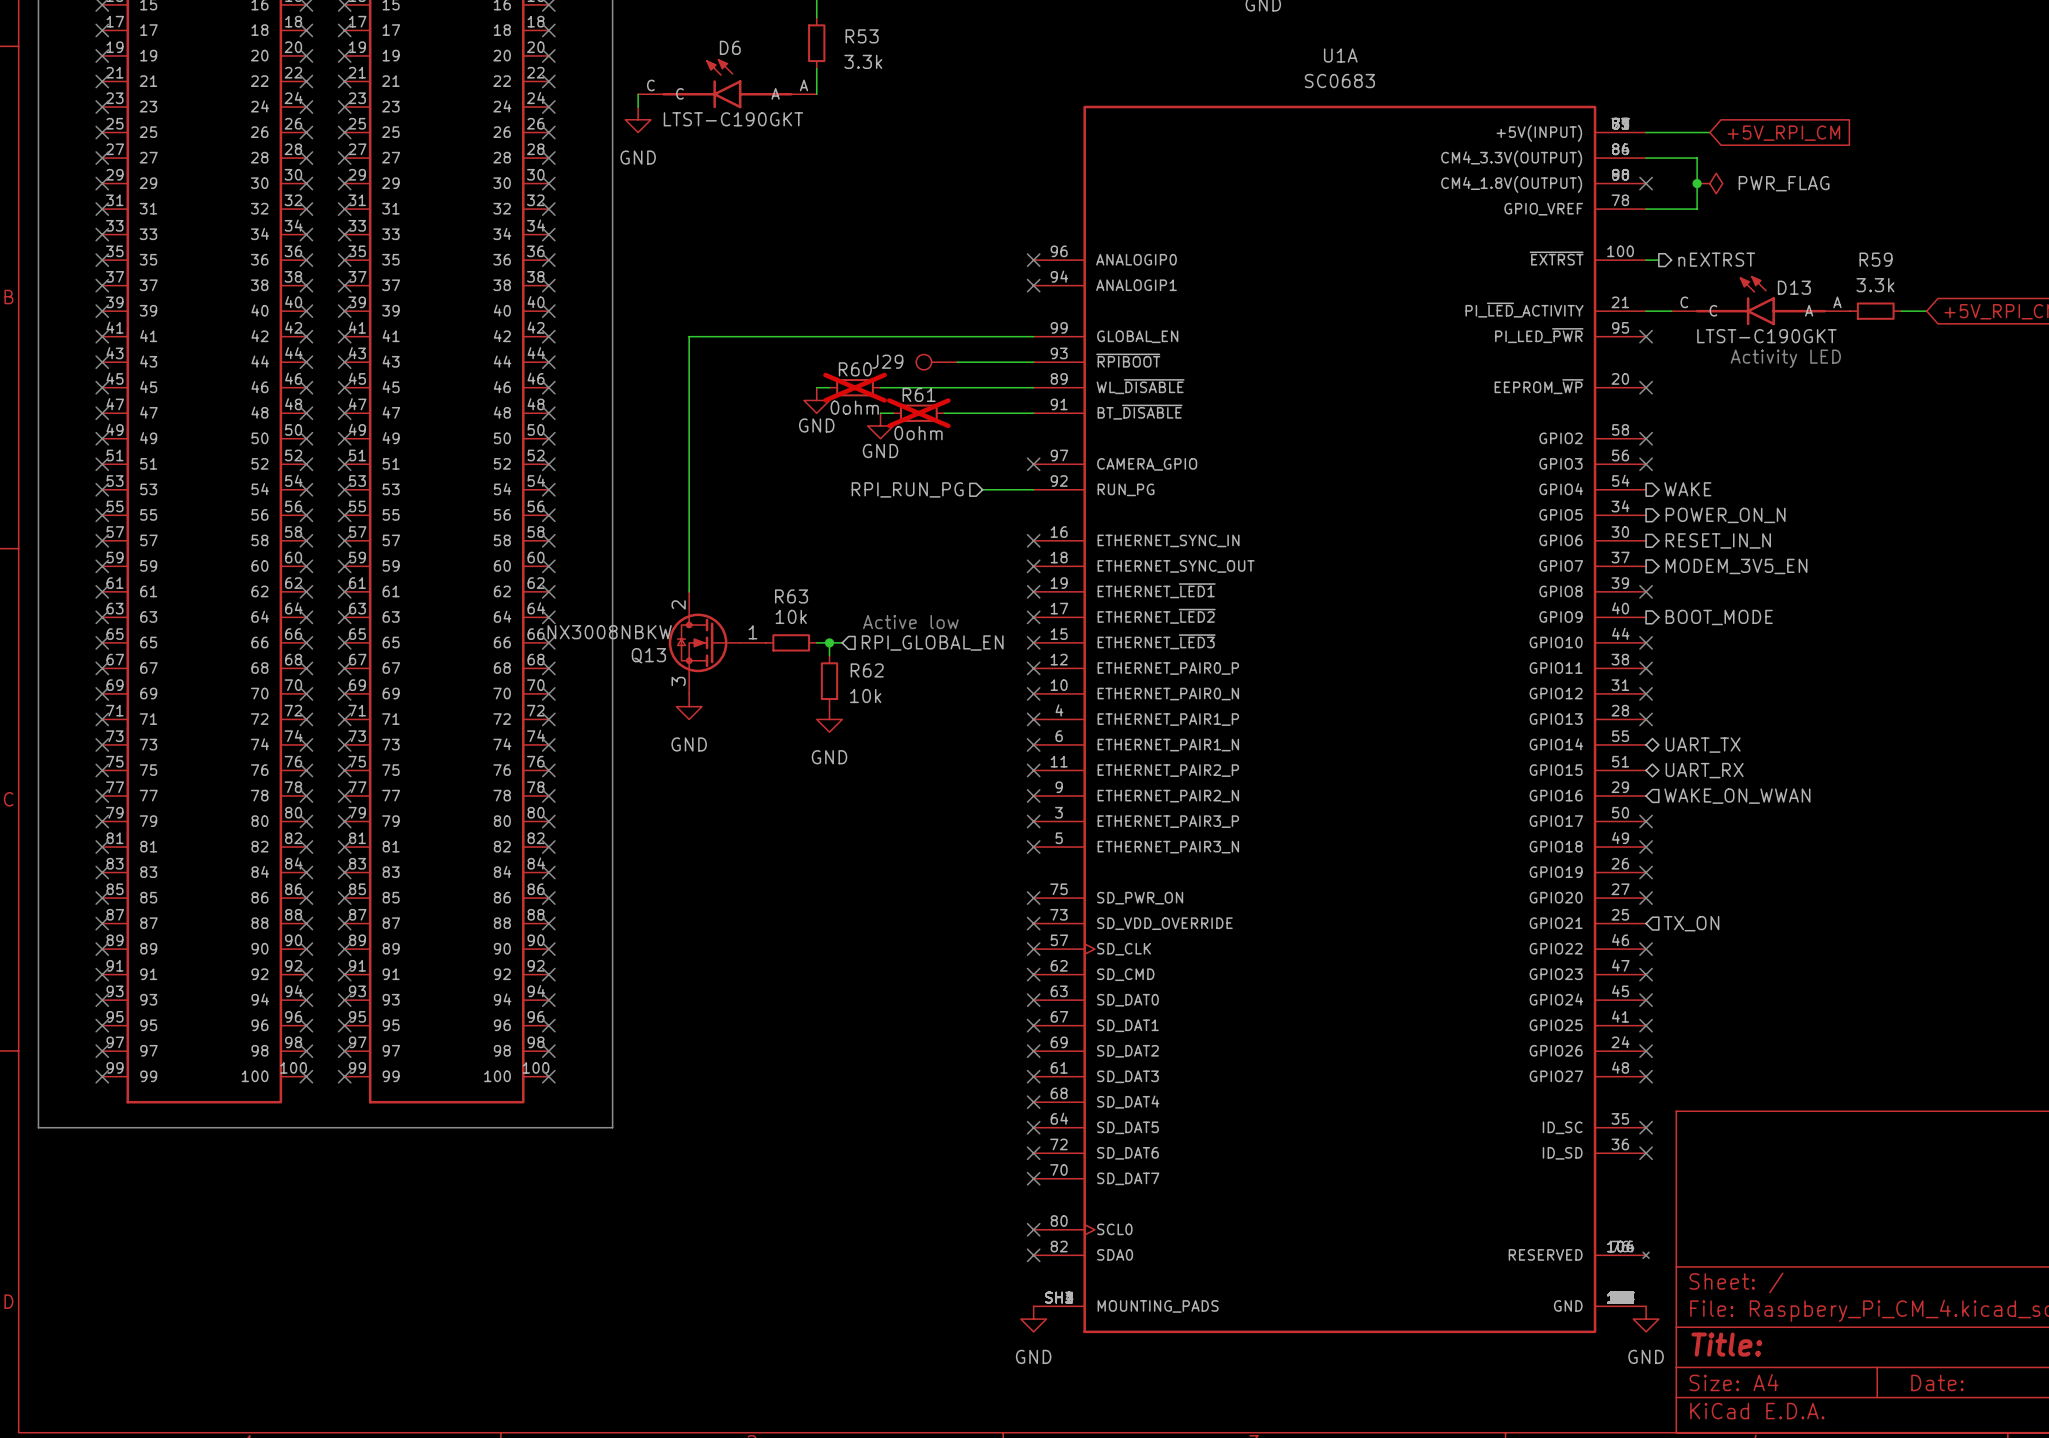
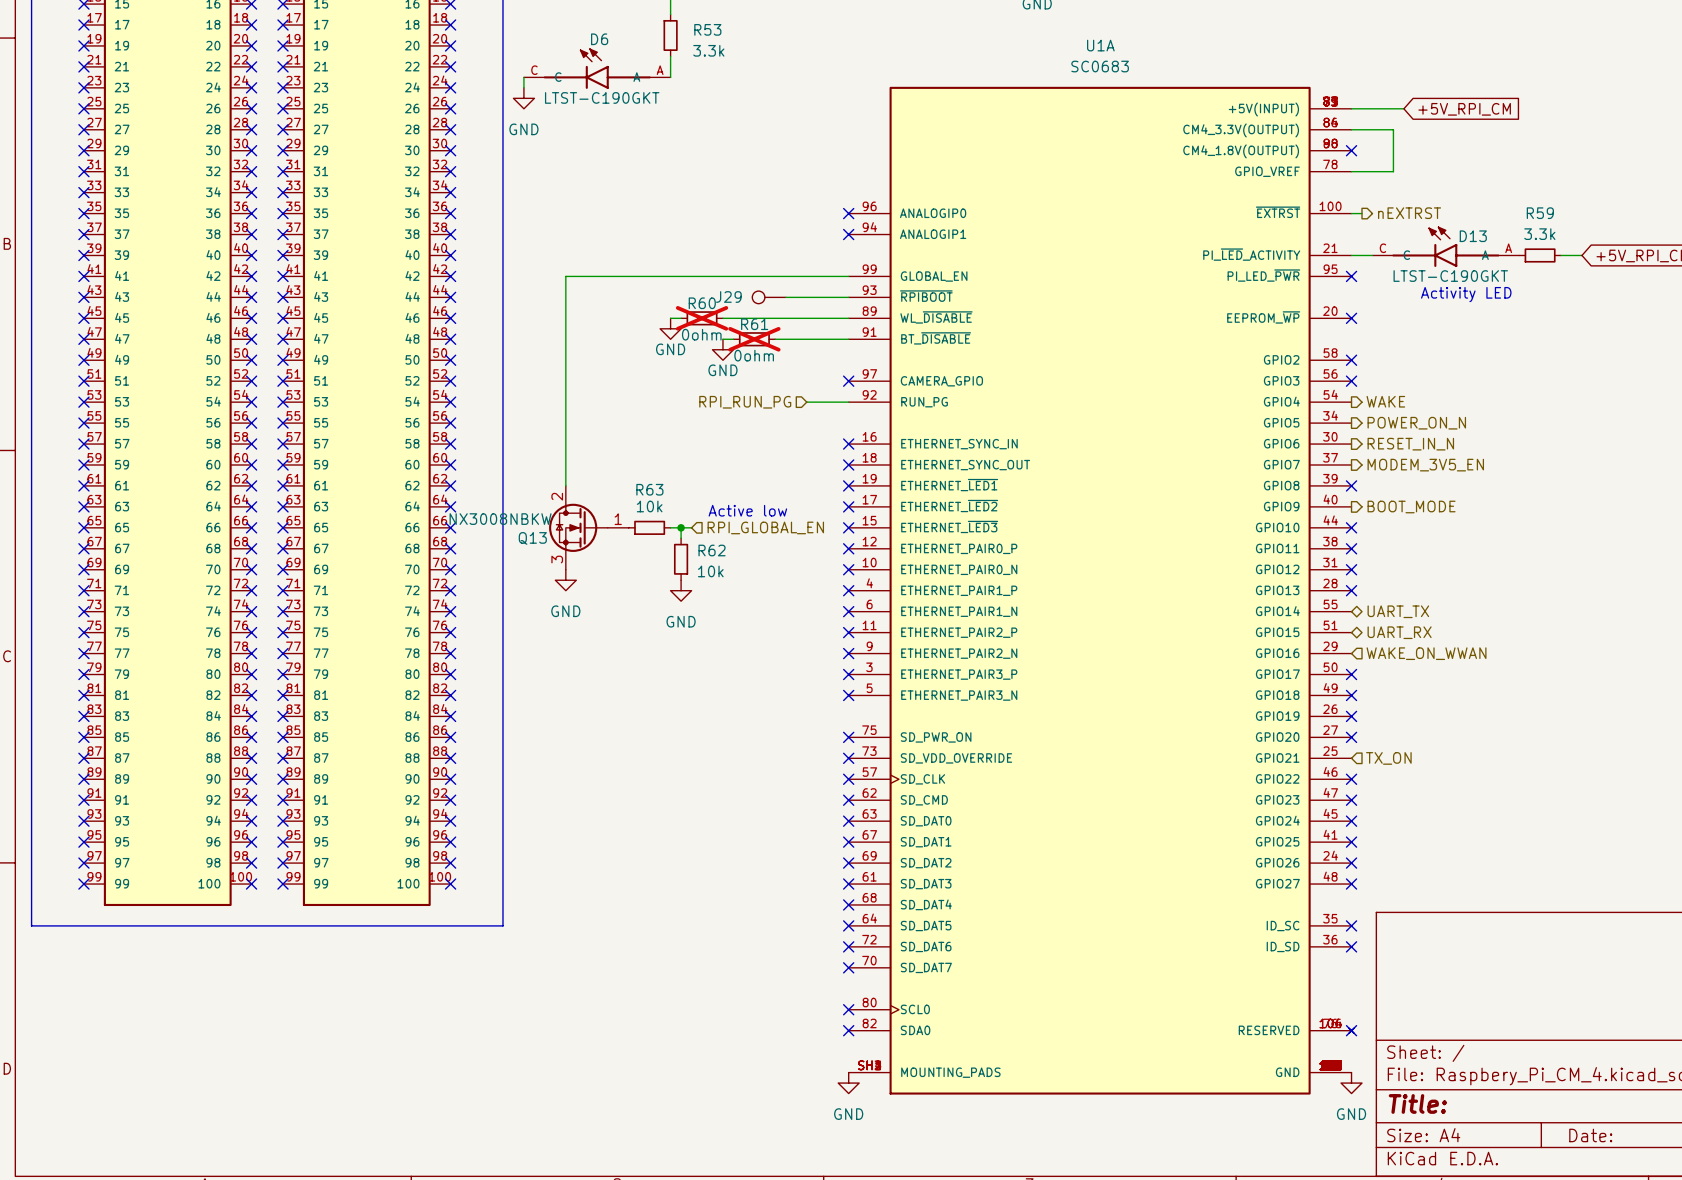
junction: (1697, 183) -> none
power symbol: PWR_FLAG (1709, 183) -> none
no-connect mark: none -> (1351, 1030)

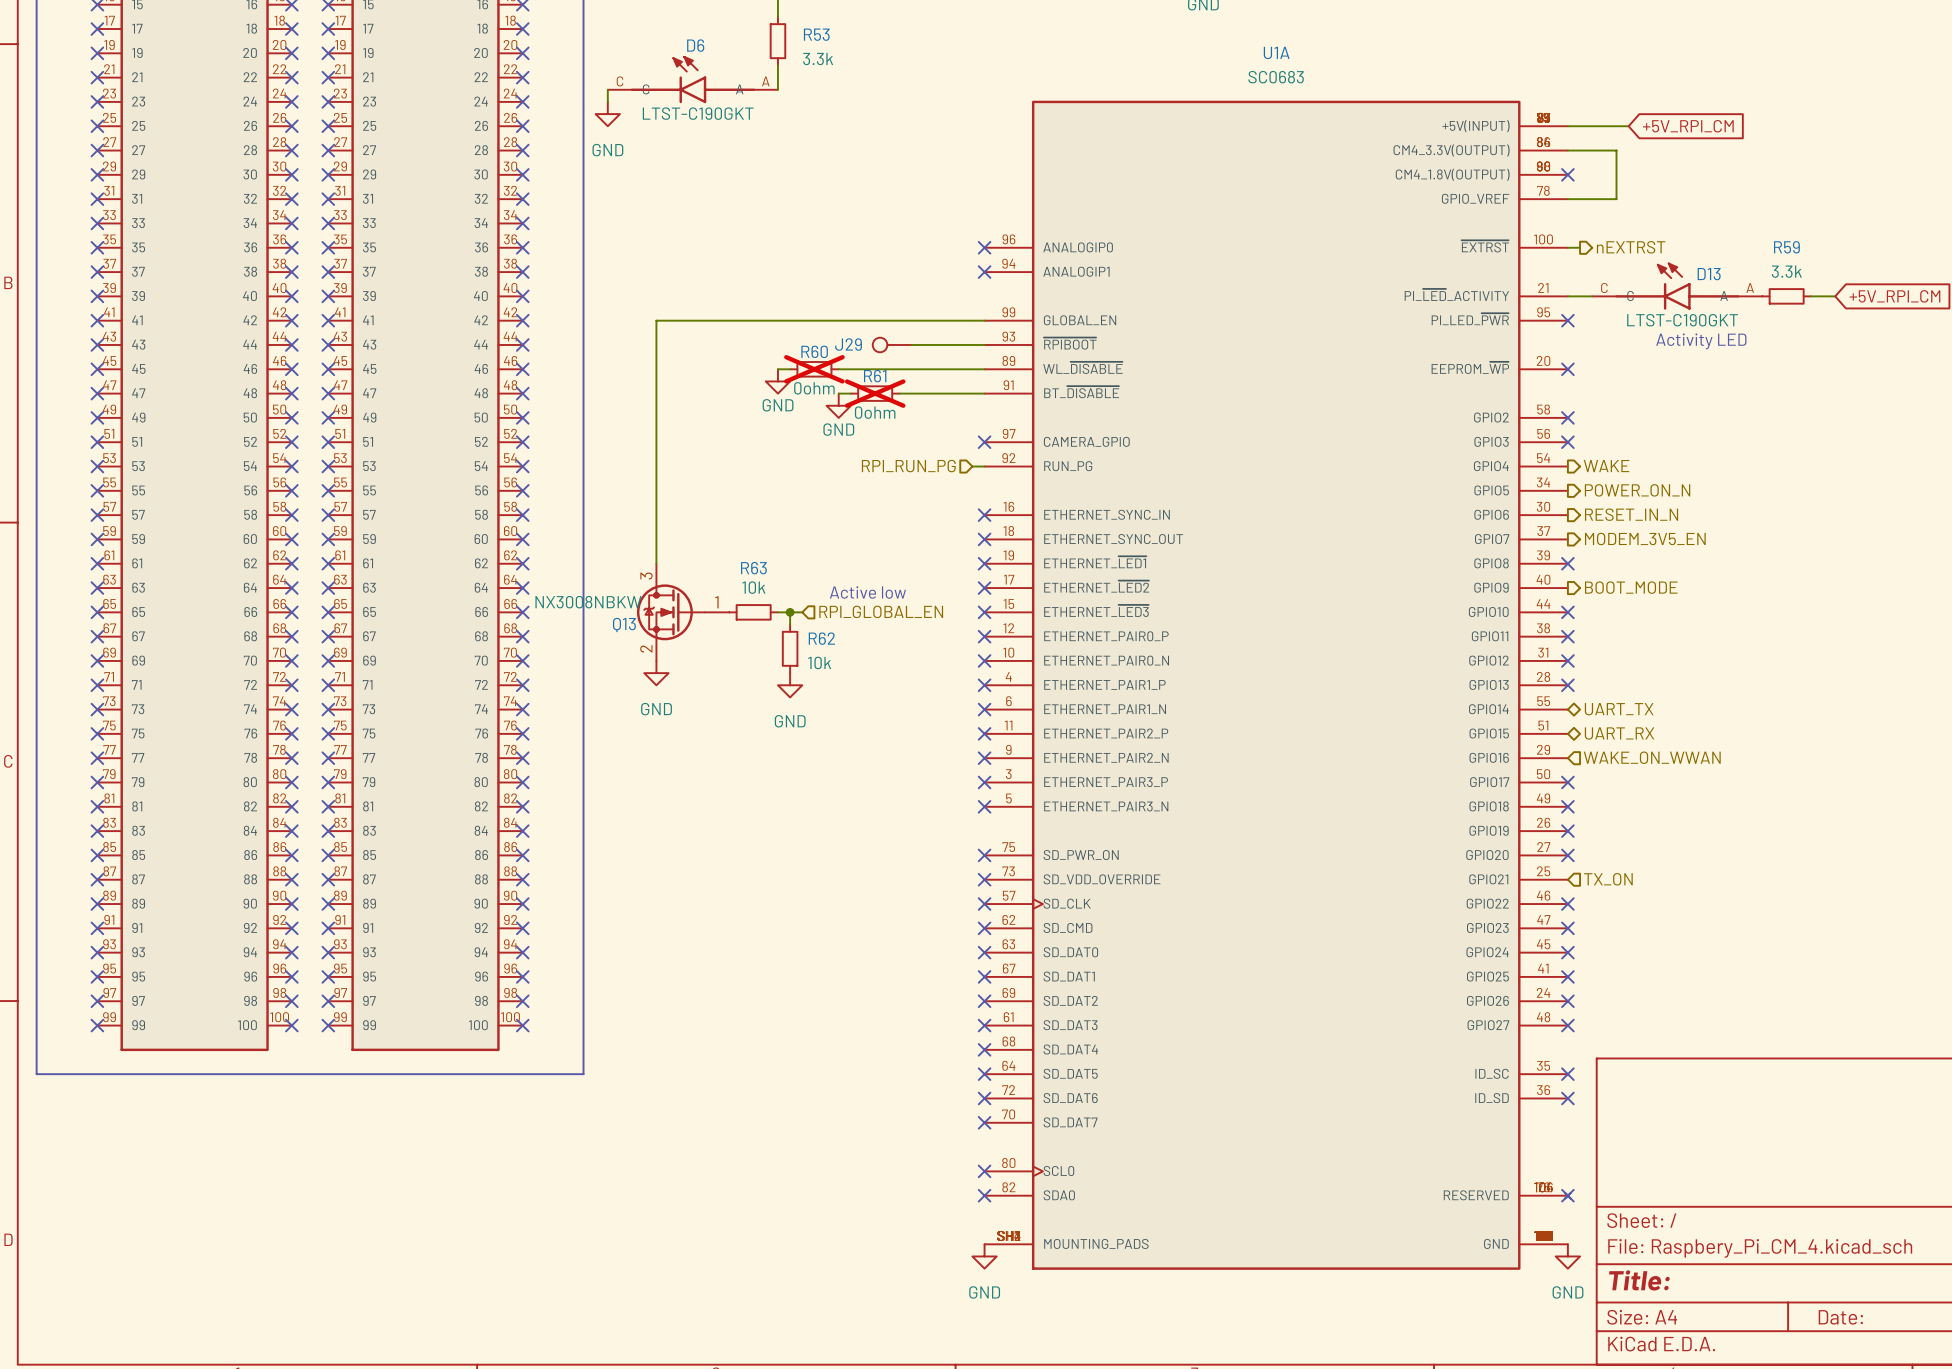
hierarchical label position: RPI_RUN_PG (745, 402) -> RPI_RUN_PG (908, 466)
wire: (806, 402) (838, 402) -> none
Q13 symbol: [549, 485, 629, 570] -> [636, 563, 730, 661]

